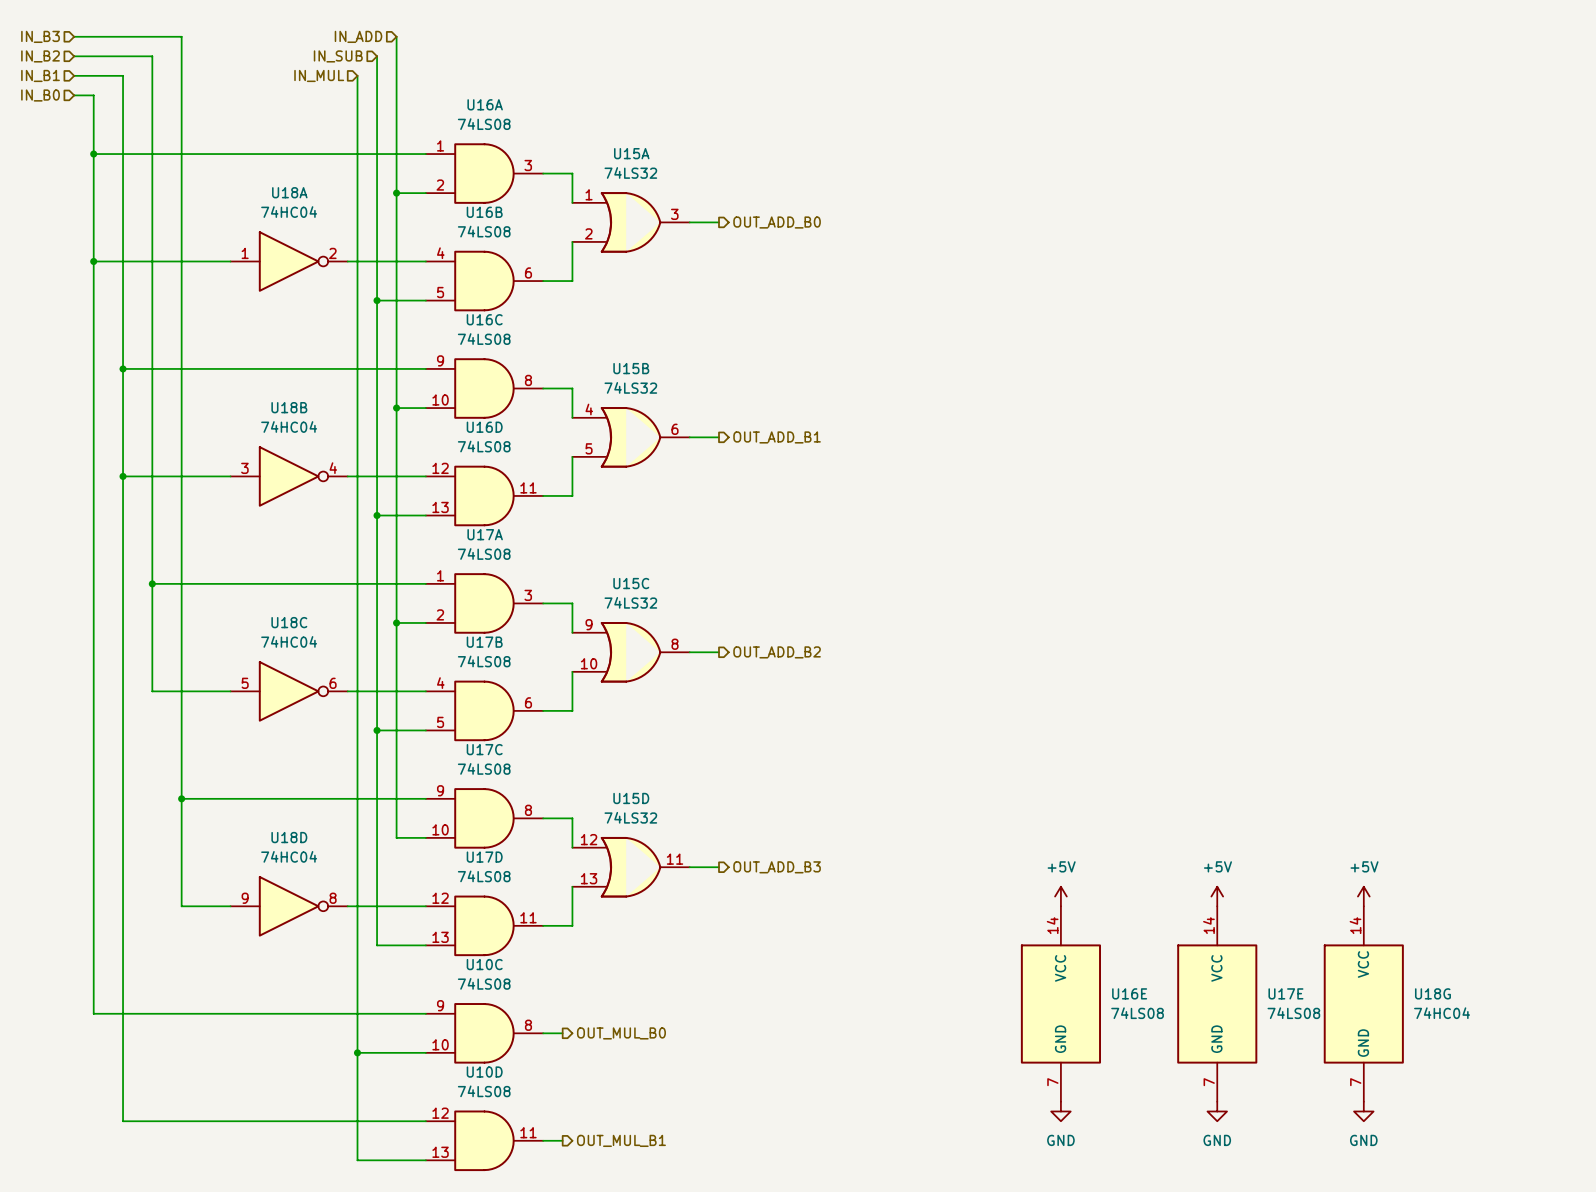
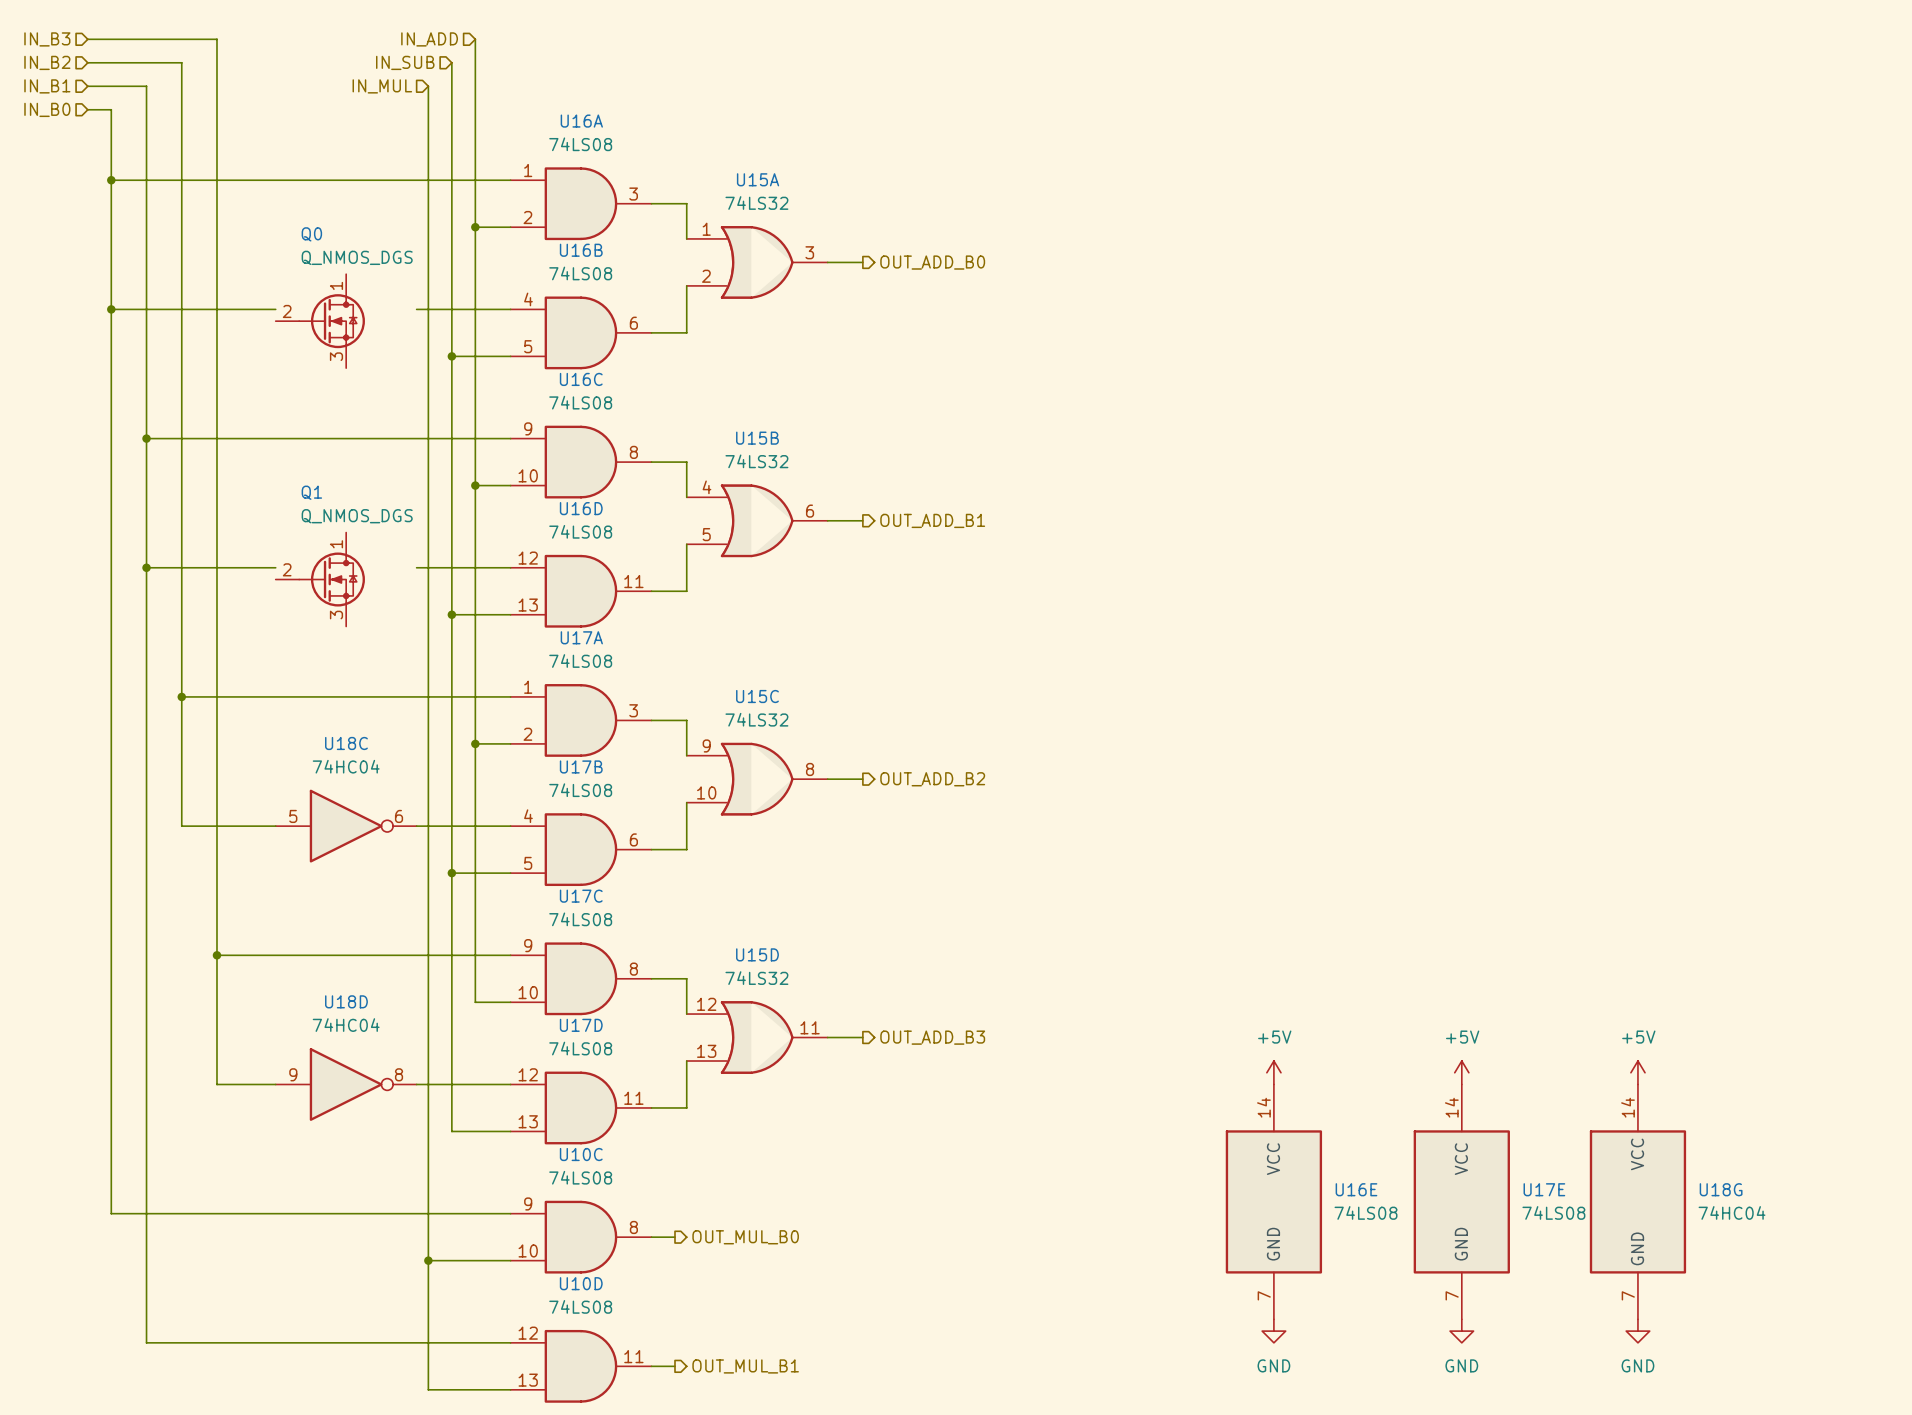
U18A: 74HC04 (289, 261) -> none
Q0: none -> Q_NMOS_DGS (320, 321)
U18B: 74HC04 (289, 476) -> none
Q1: none -> Q_NMOS_DGS (320, 579)

